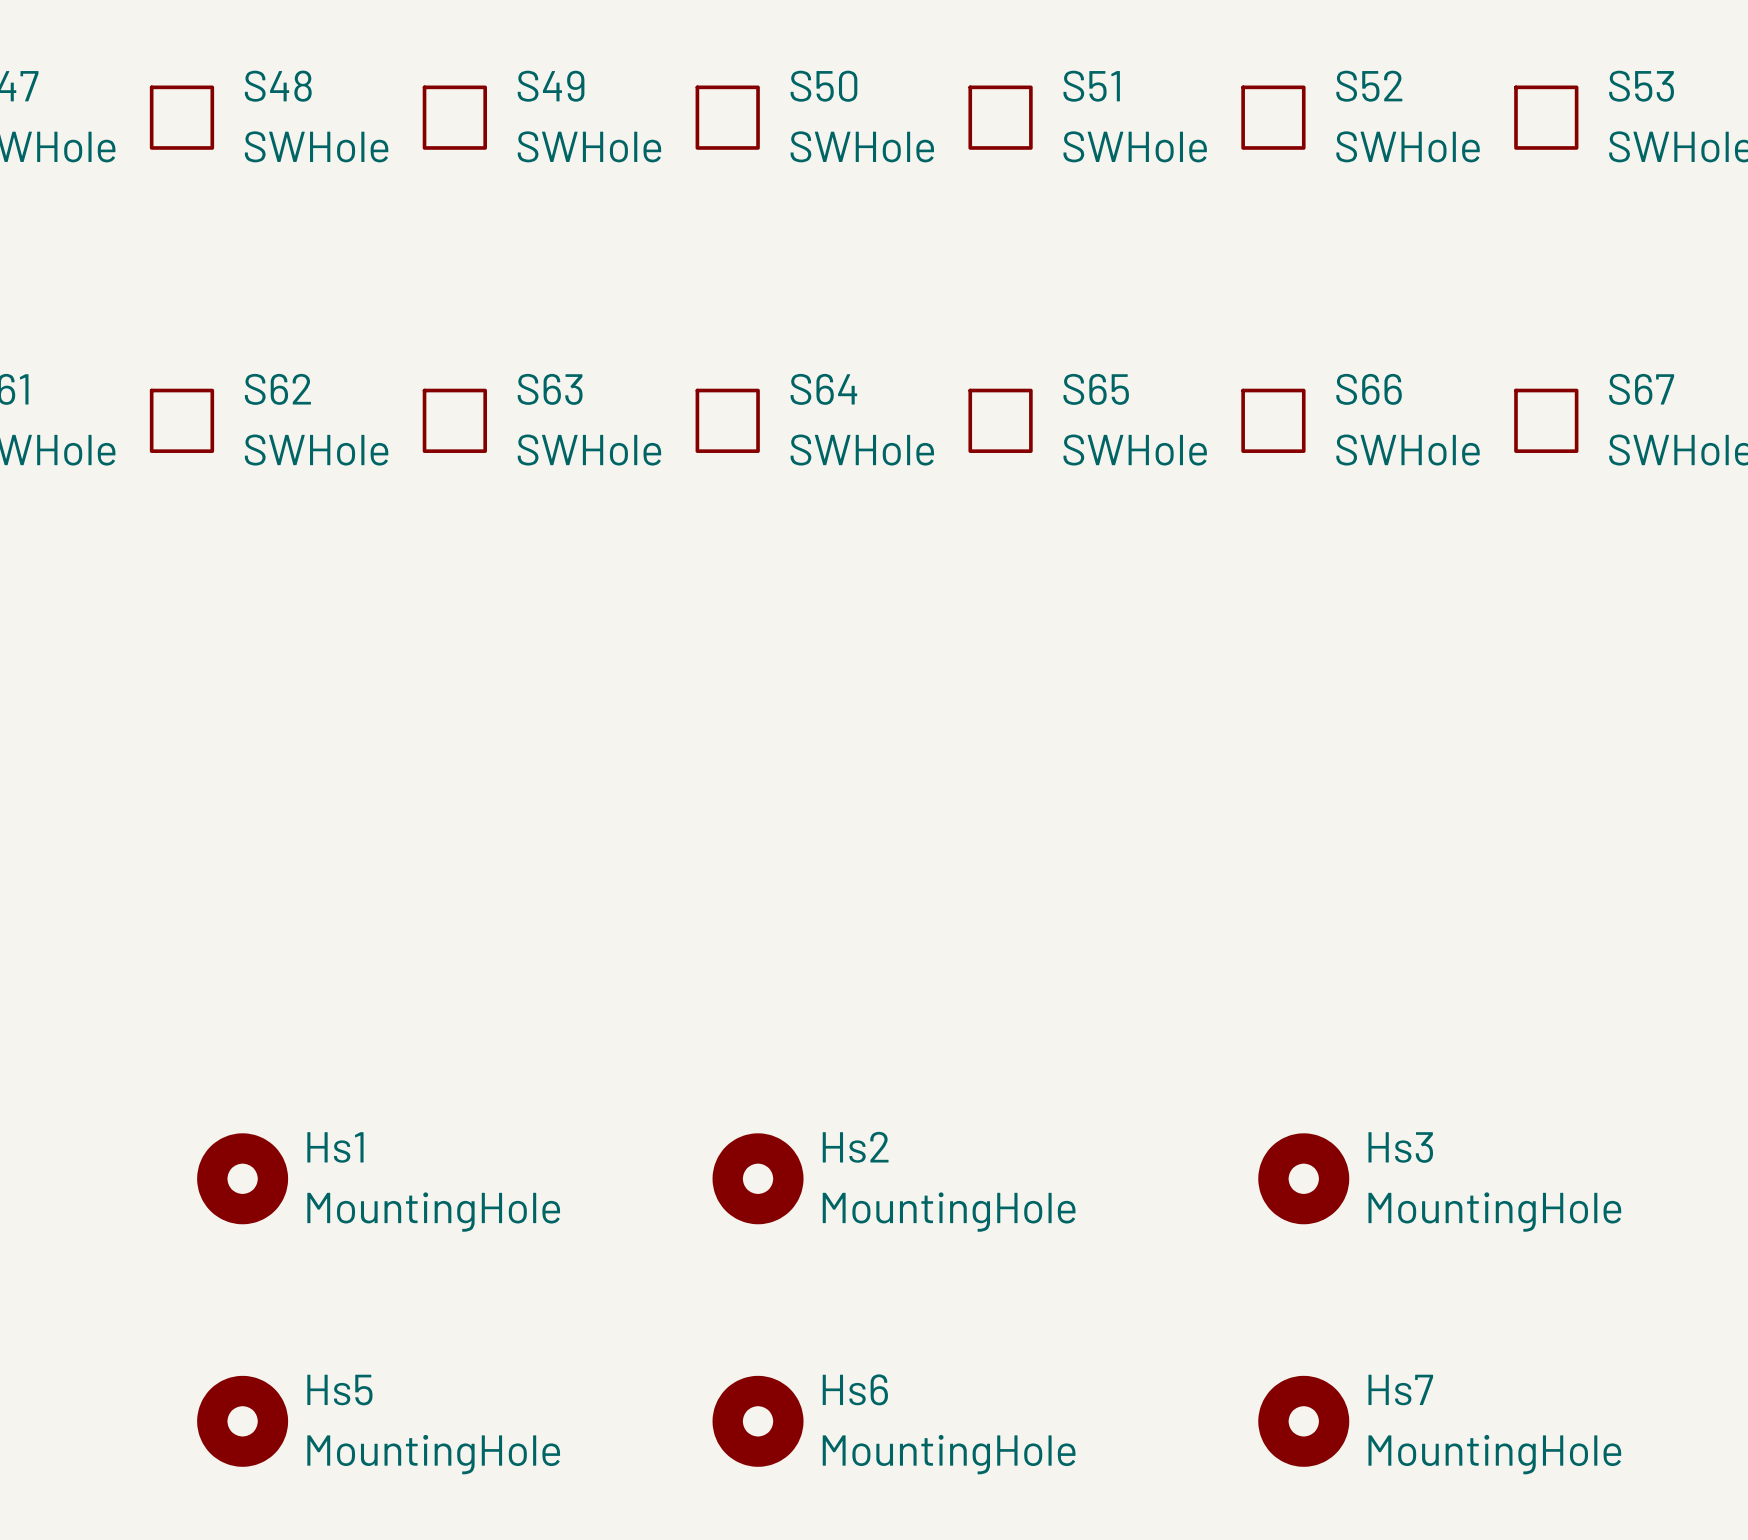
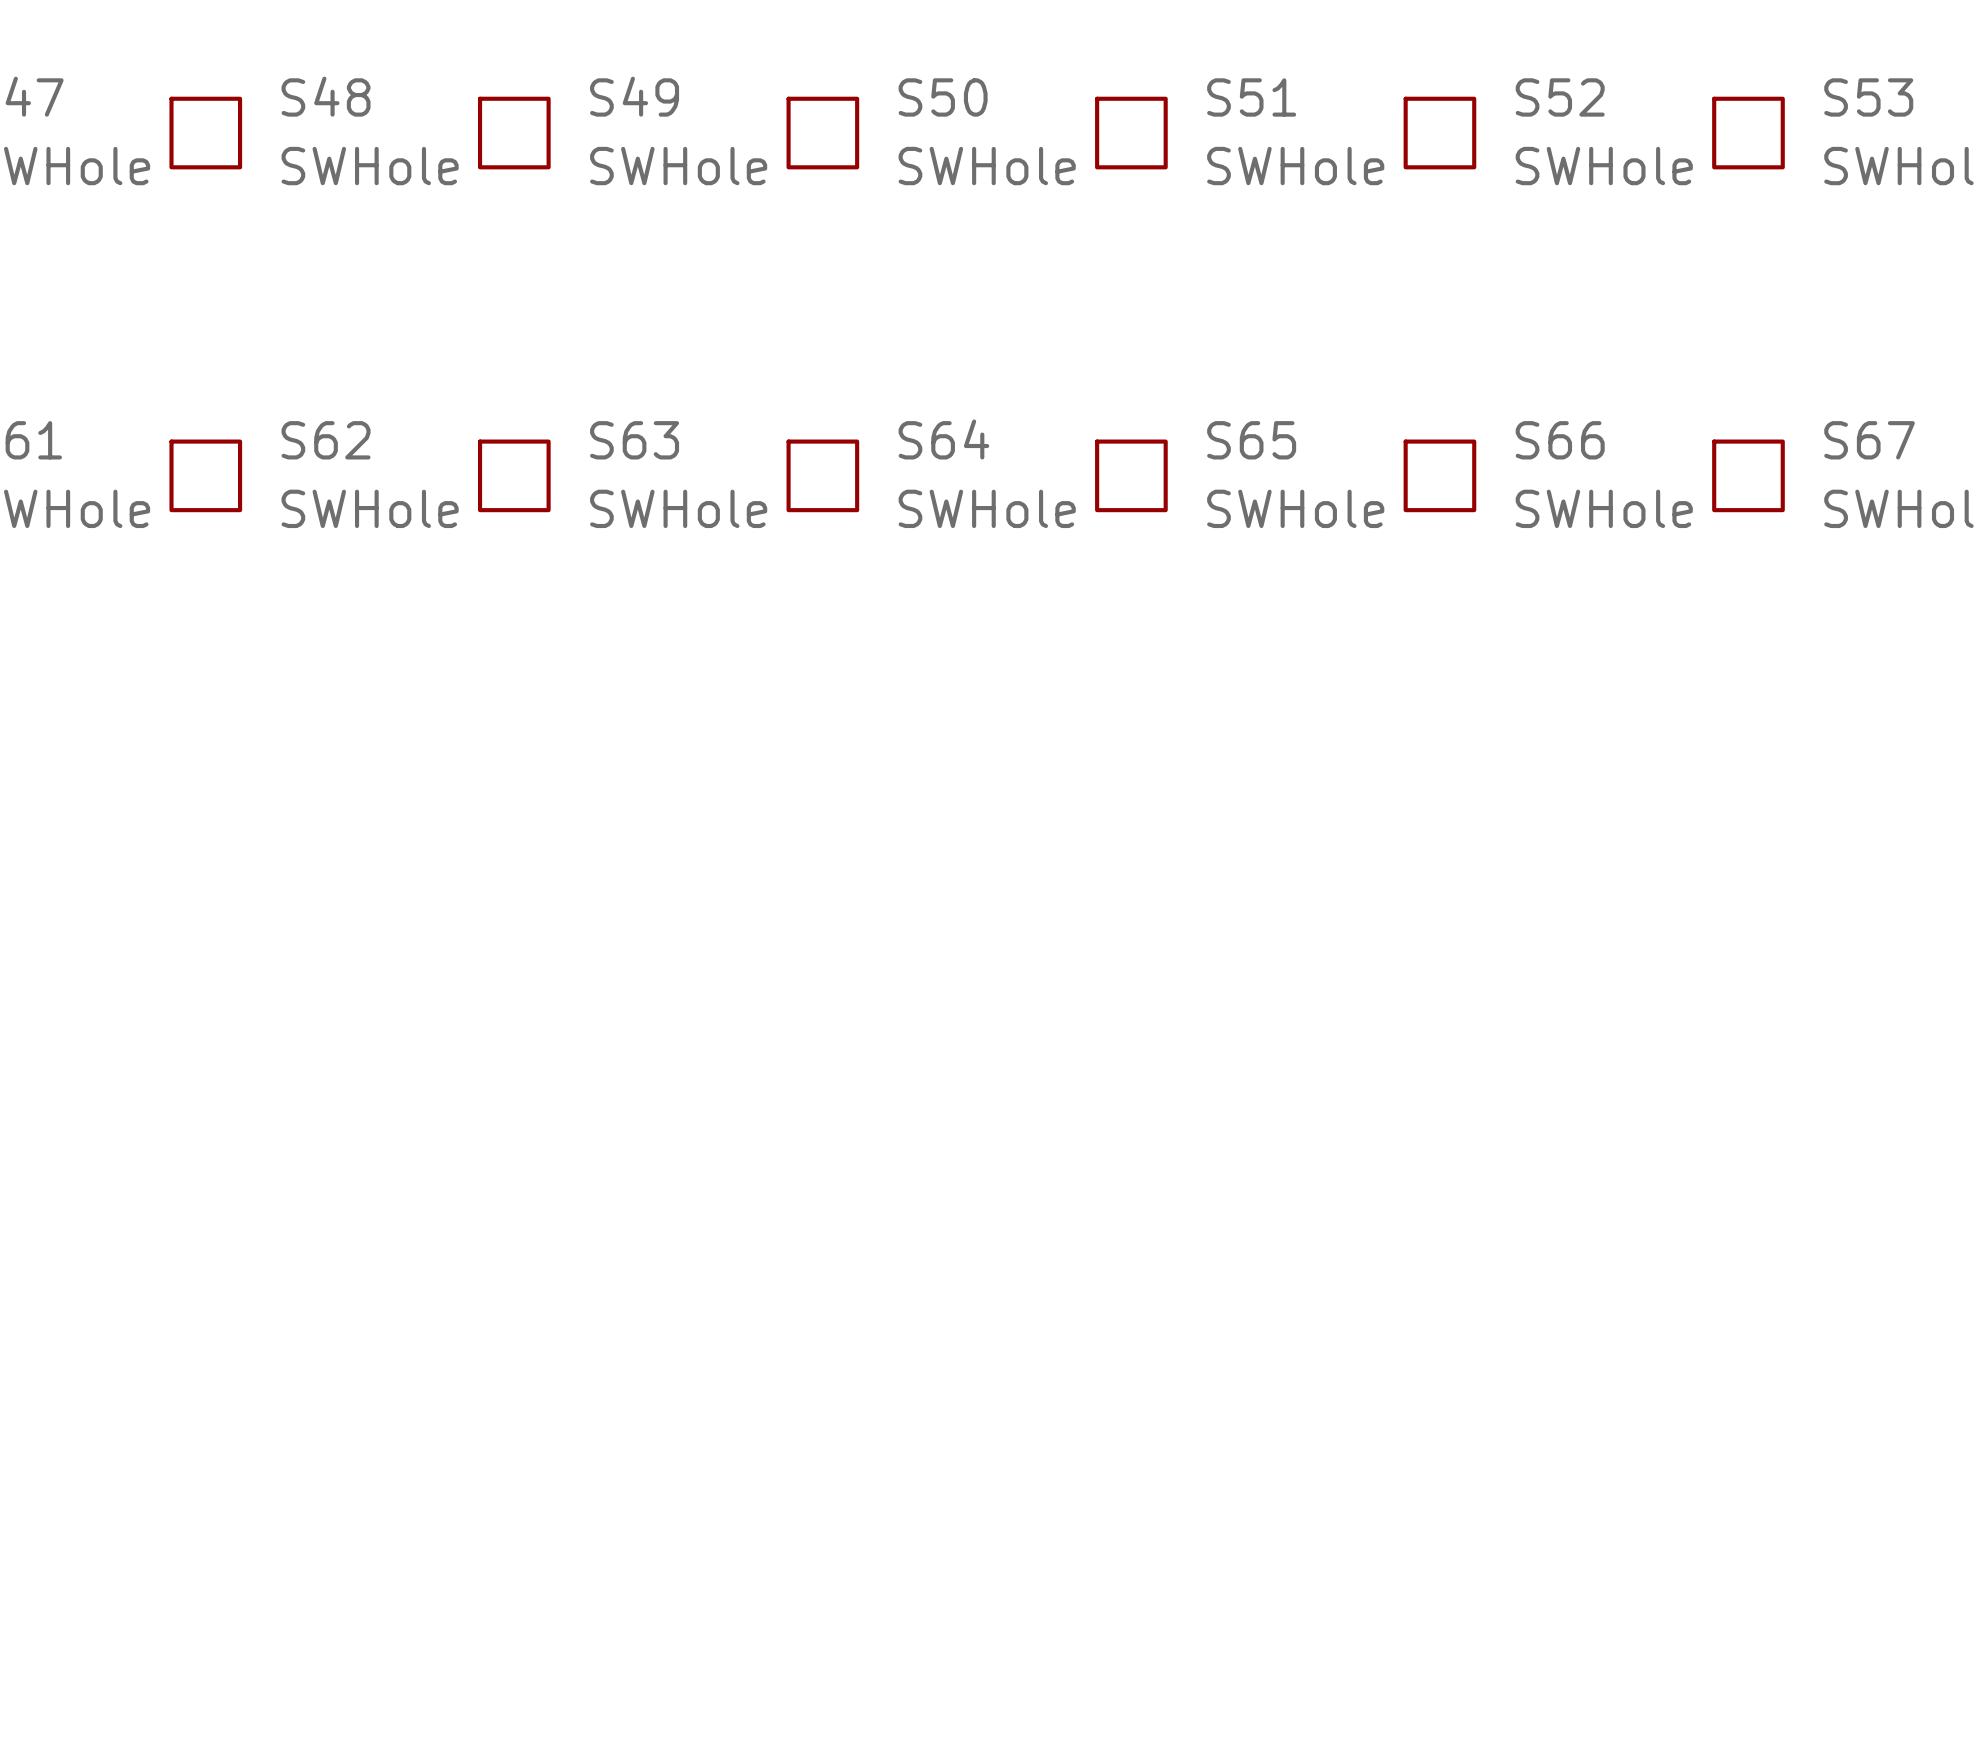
Hs1: MountingHole (242, 1178) -> none
Hs2: MountingHole (758, 1178) -> none
Hs3: MountingHole (1303, 1178) -> none
Hs5: MountingHole (242, 1421) -> none
Hs6: MountingHole (758, 1421) -> none
Hs7: MountingHole (1303, 1421) -> none

